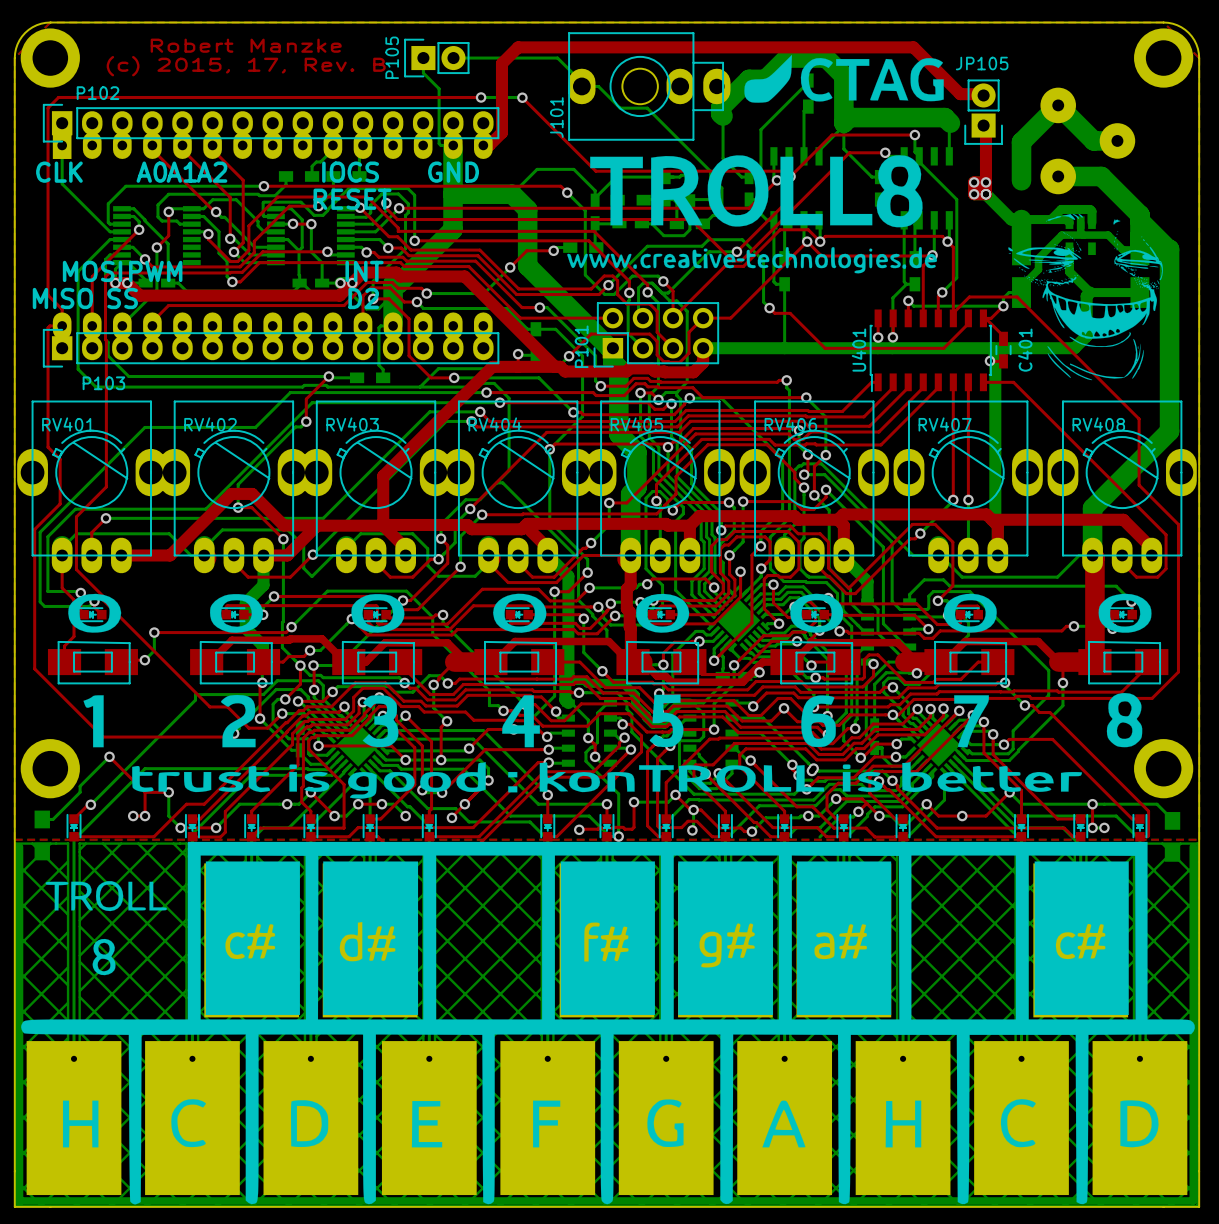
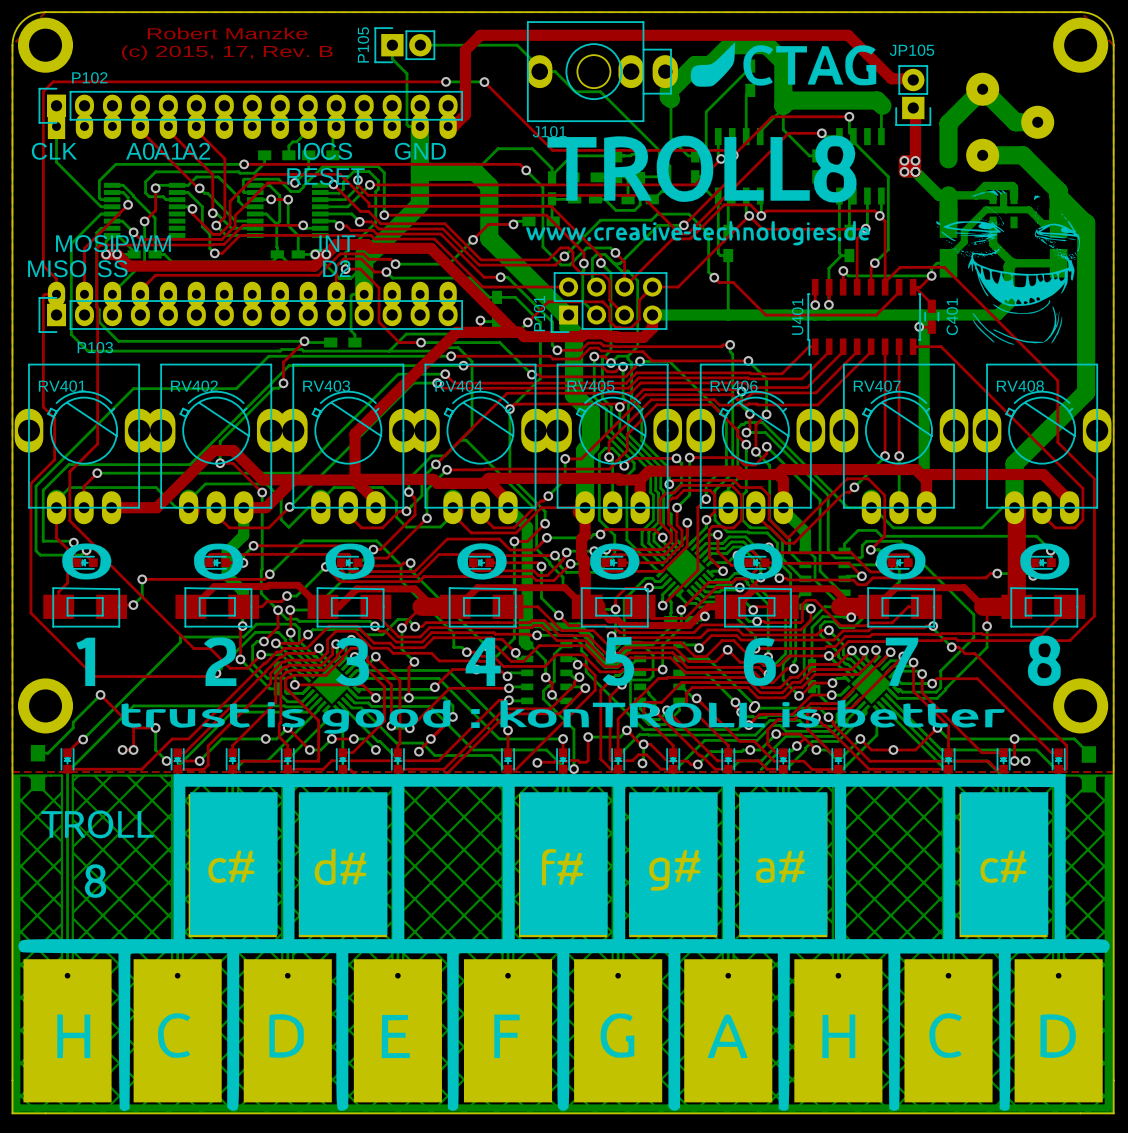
J101 name rotation: 0° (556, 117) -> 90° clockwise (549, 131)

